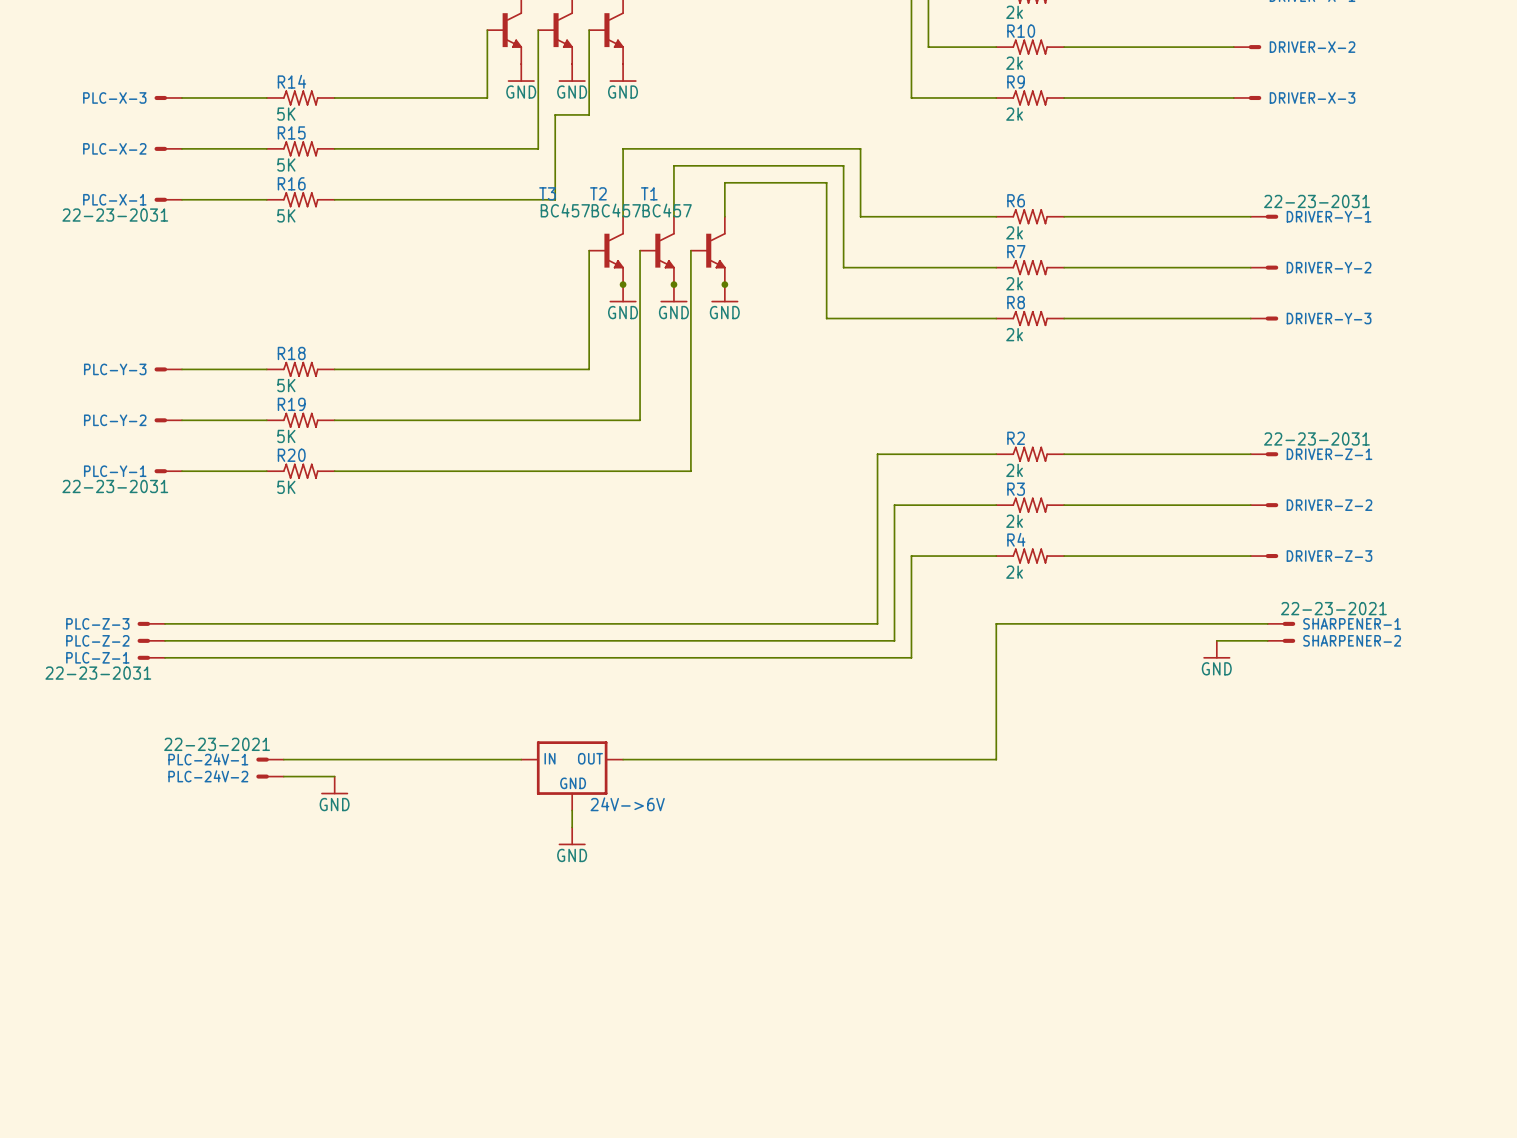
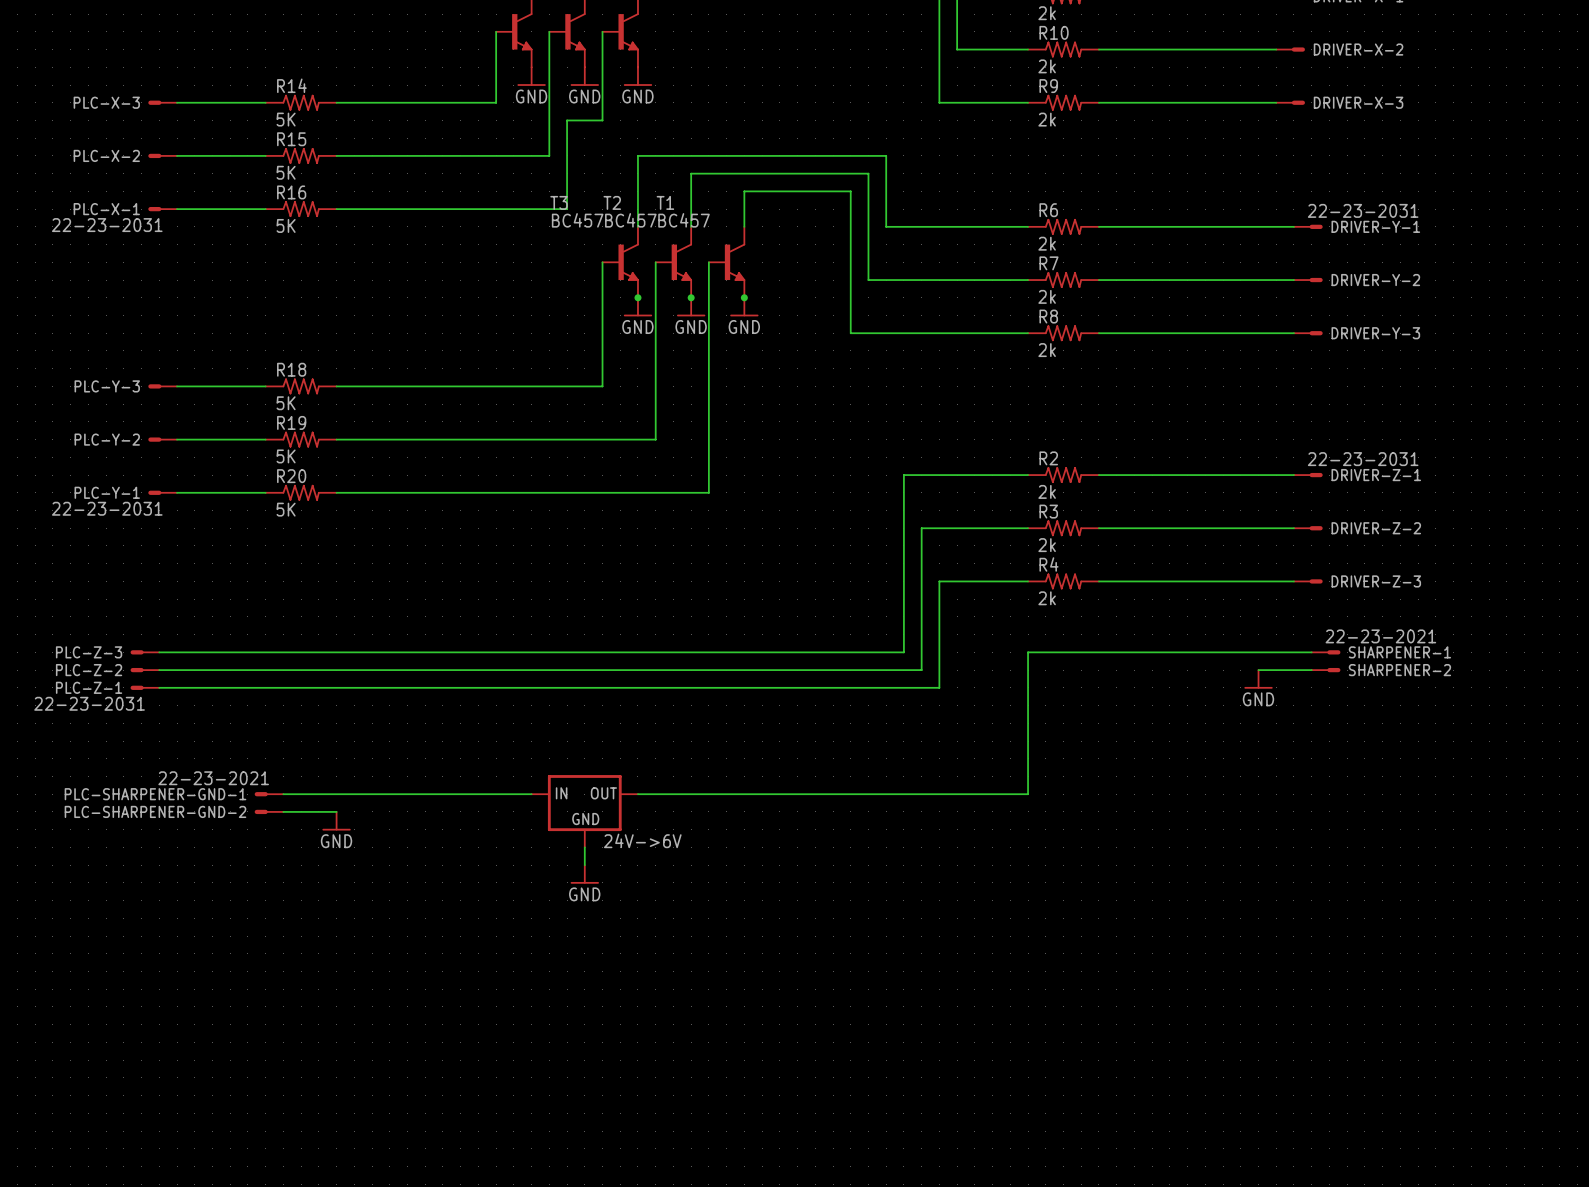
PLC-24V-1 name: PLC-24V-1 (208, 759) -> PLC-SHARPENER-GND-1 (155, 794)
PLC-24V-2 name: PLC-24V-2 (208, 776) -> PLC-SHARPENER-GND-2 (155, 811)

